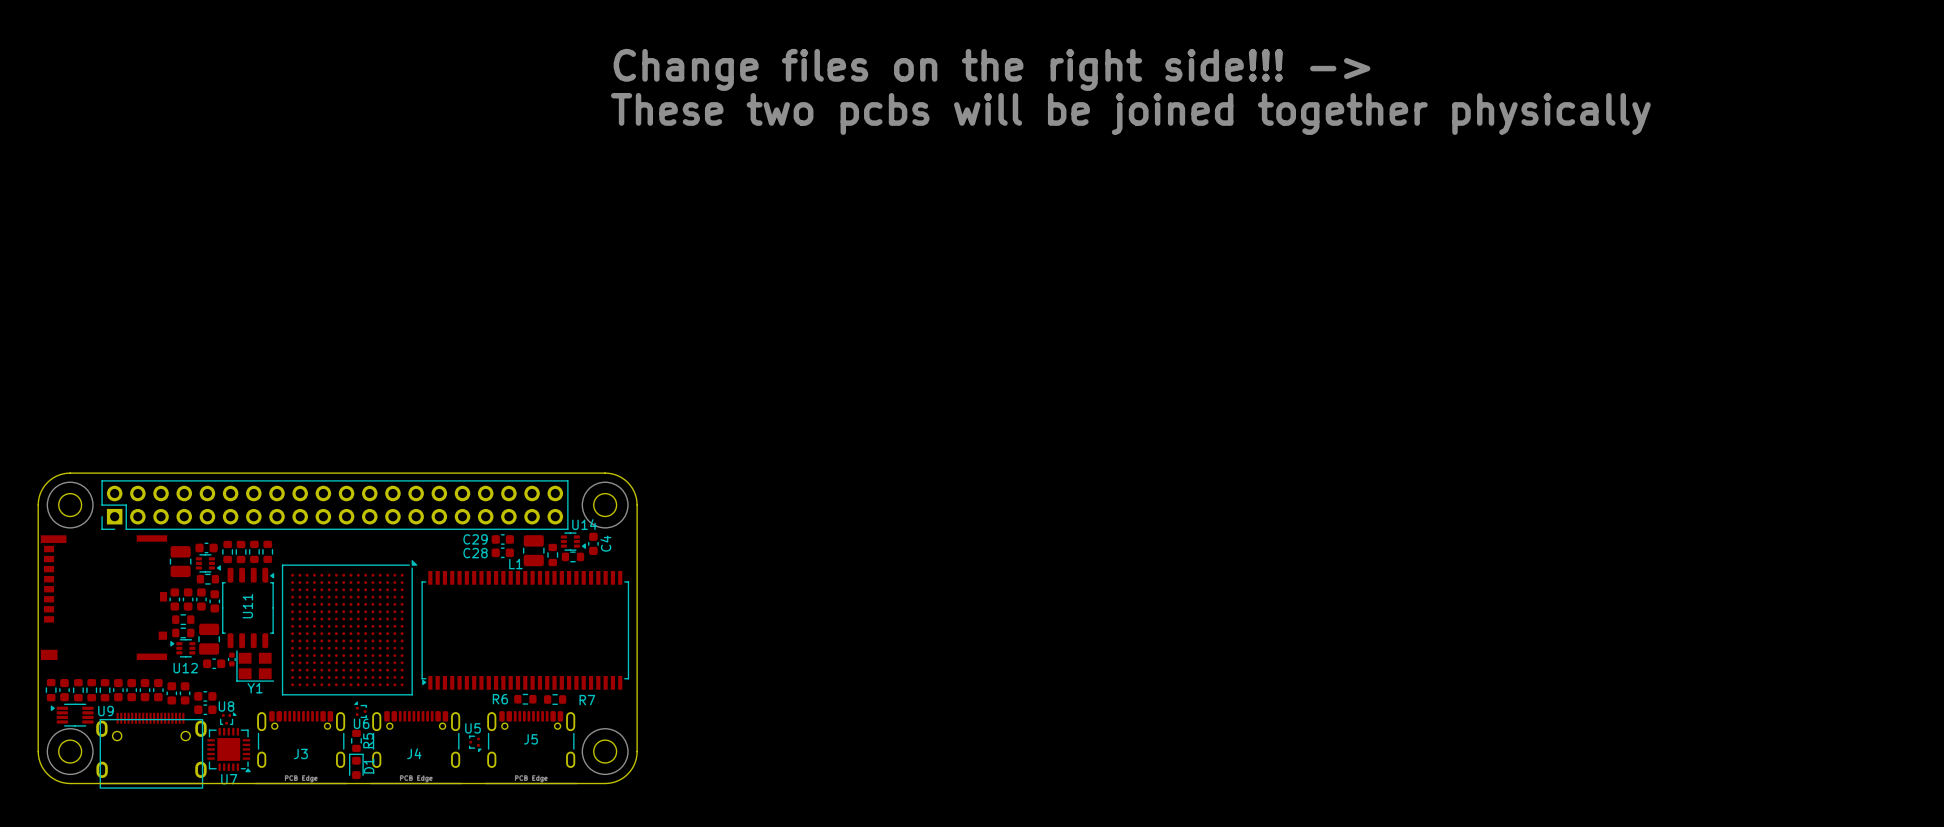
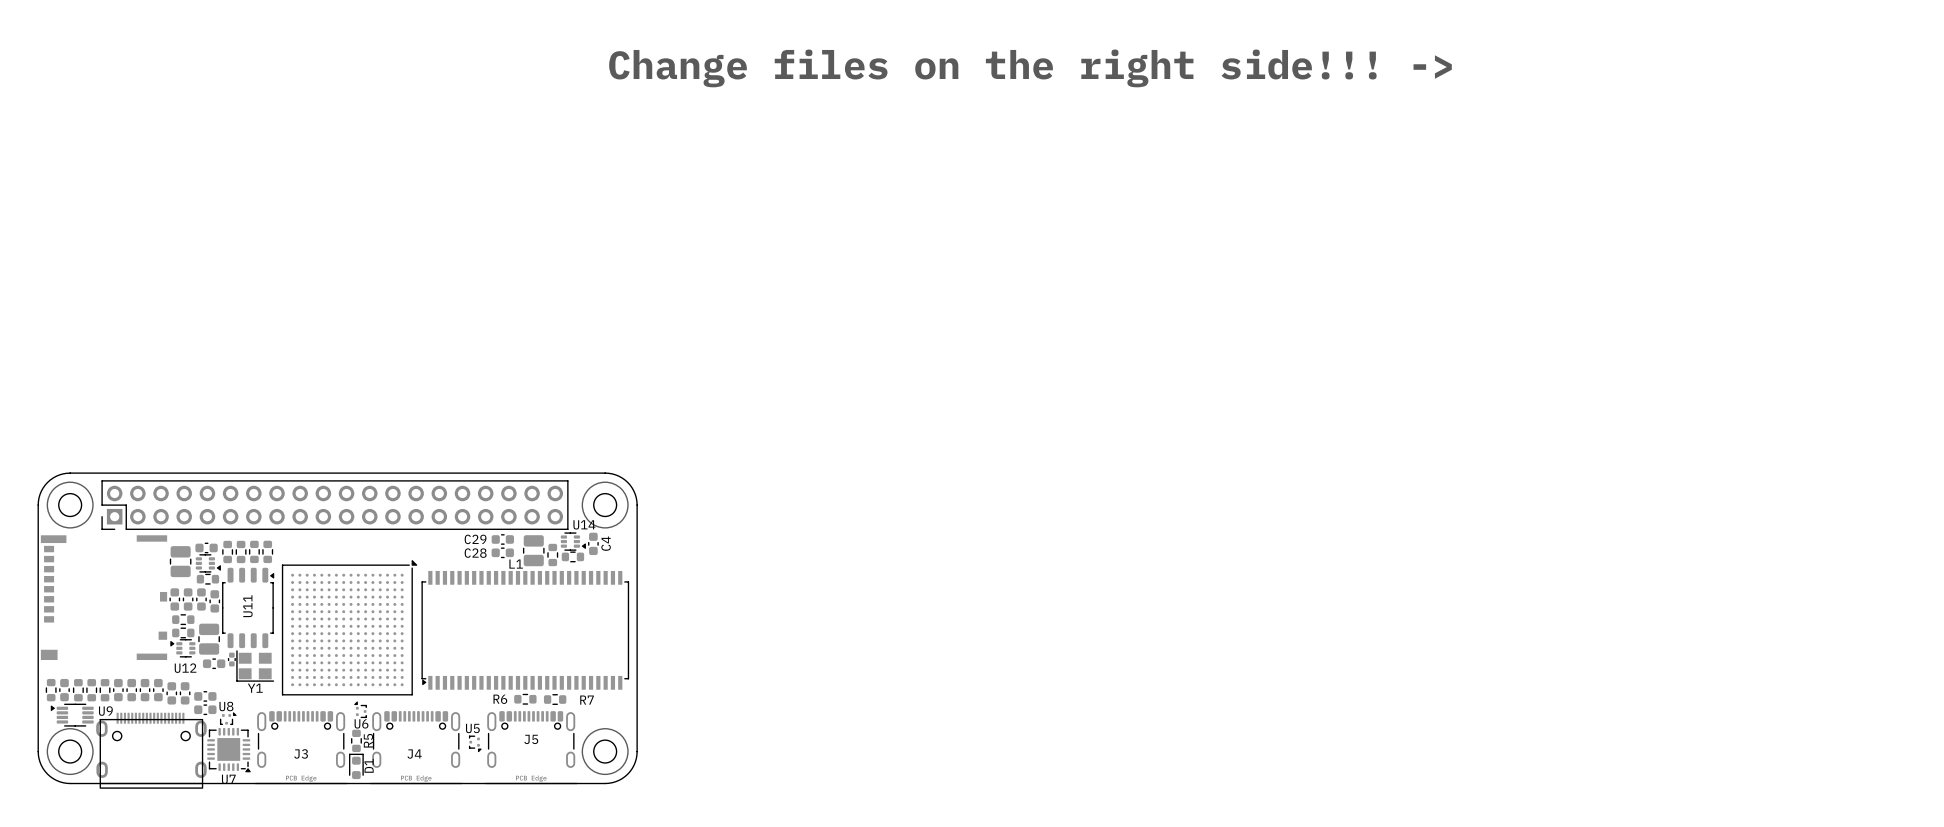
text: These two pcbs will be joined together physically (1130, 113) -> none

